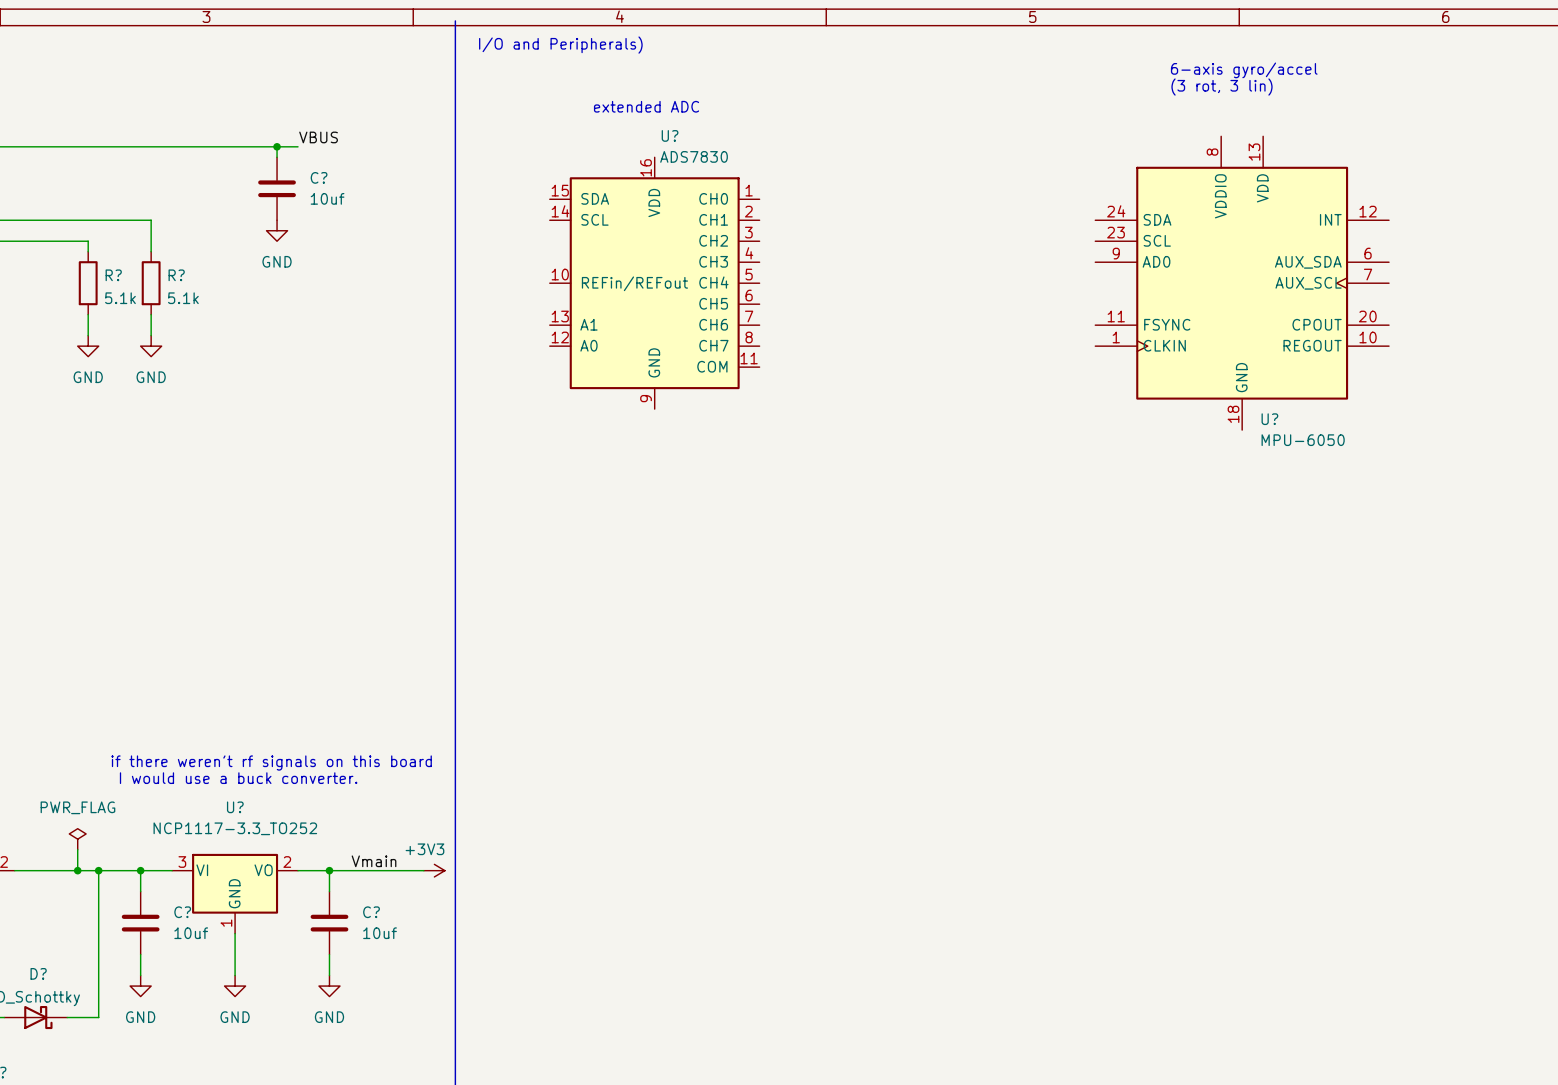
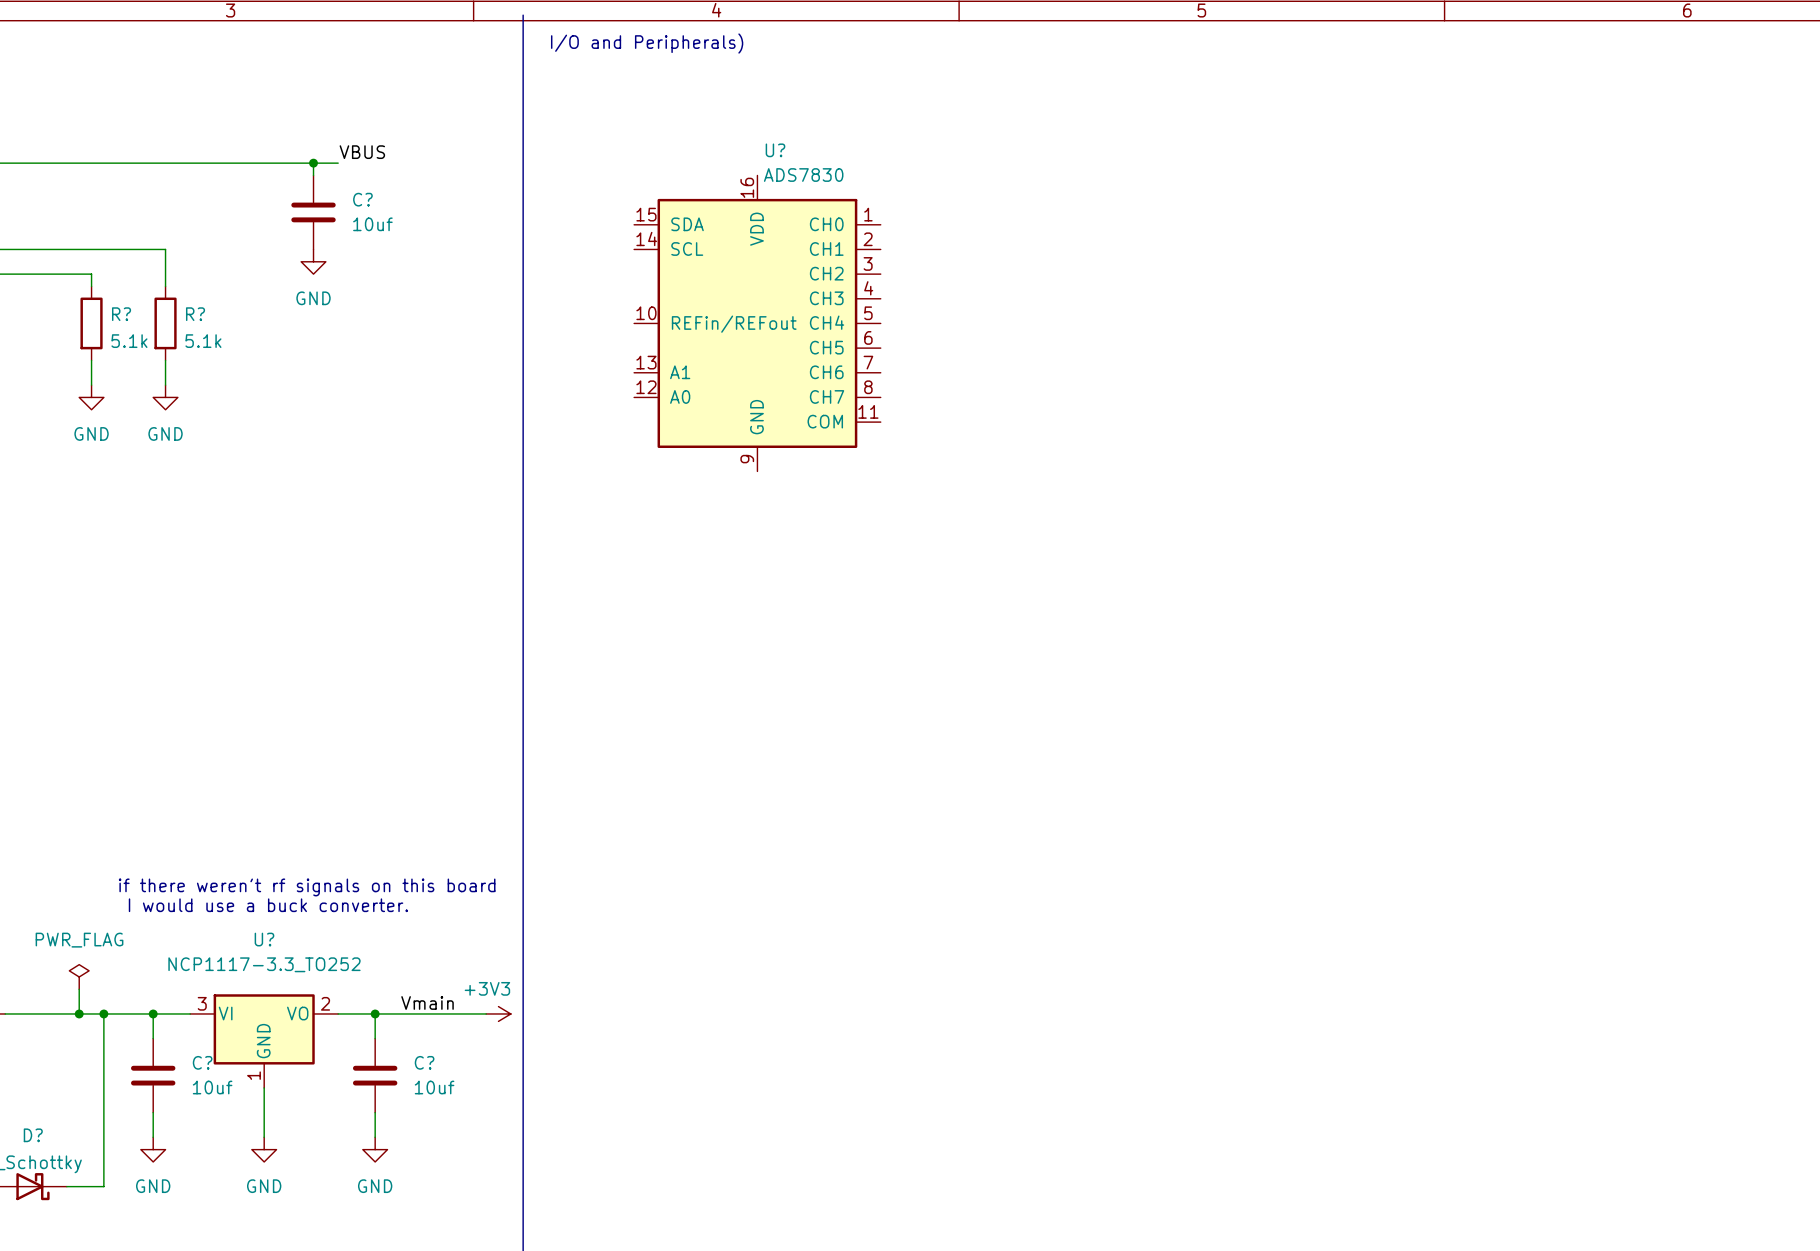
text: 6-axis gyro/accel (1244, 70) -> none
text: (3 rot, 3 lin) (1222, 87) -> none
text: extended ADC (646, 106) -> none
U?: MPU-6050 (1242, 283) -> none

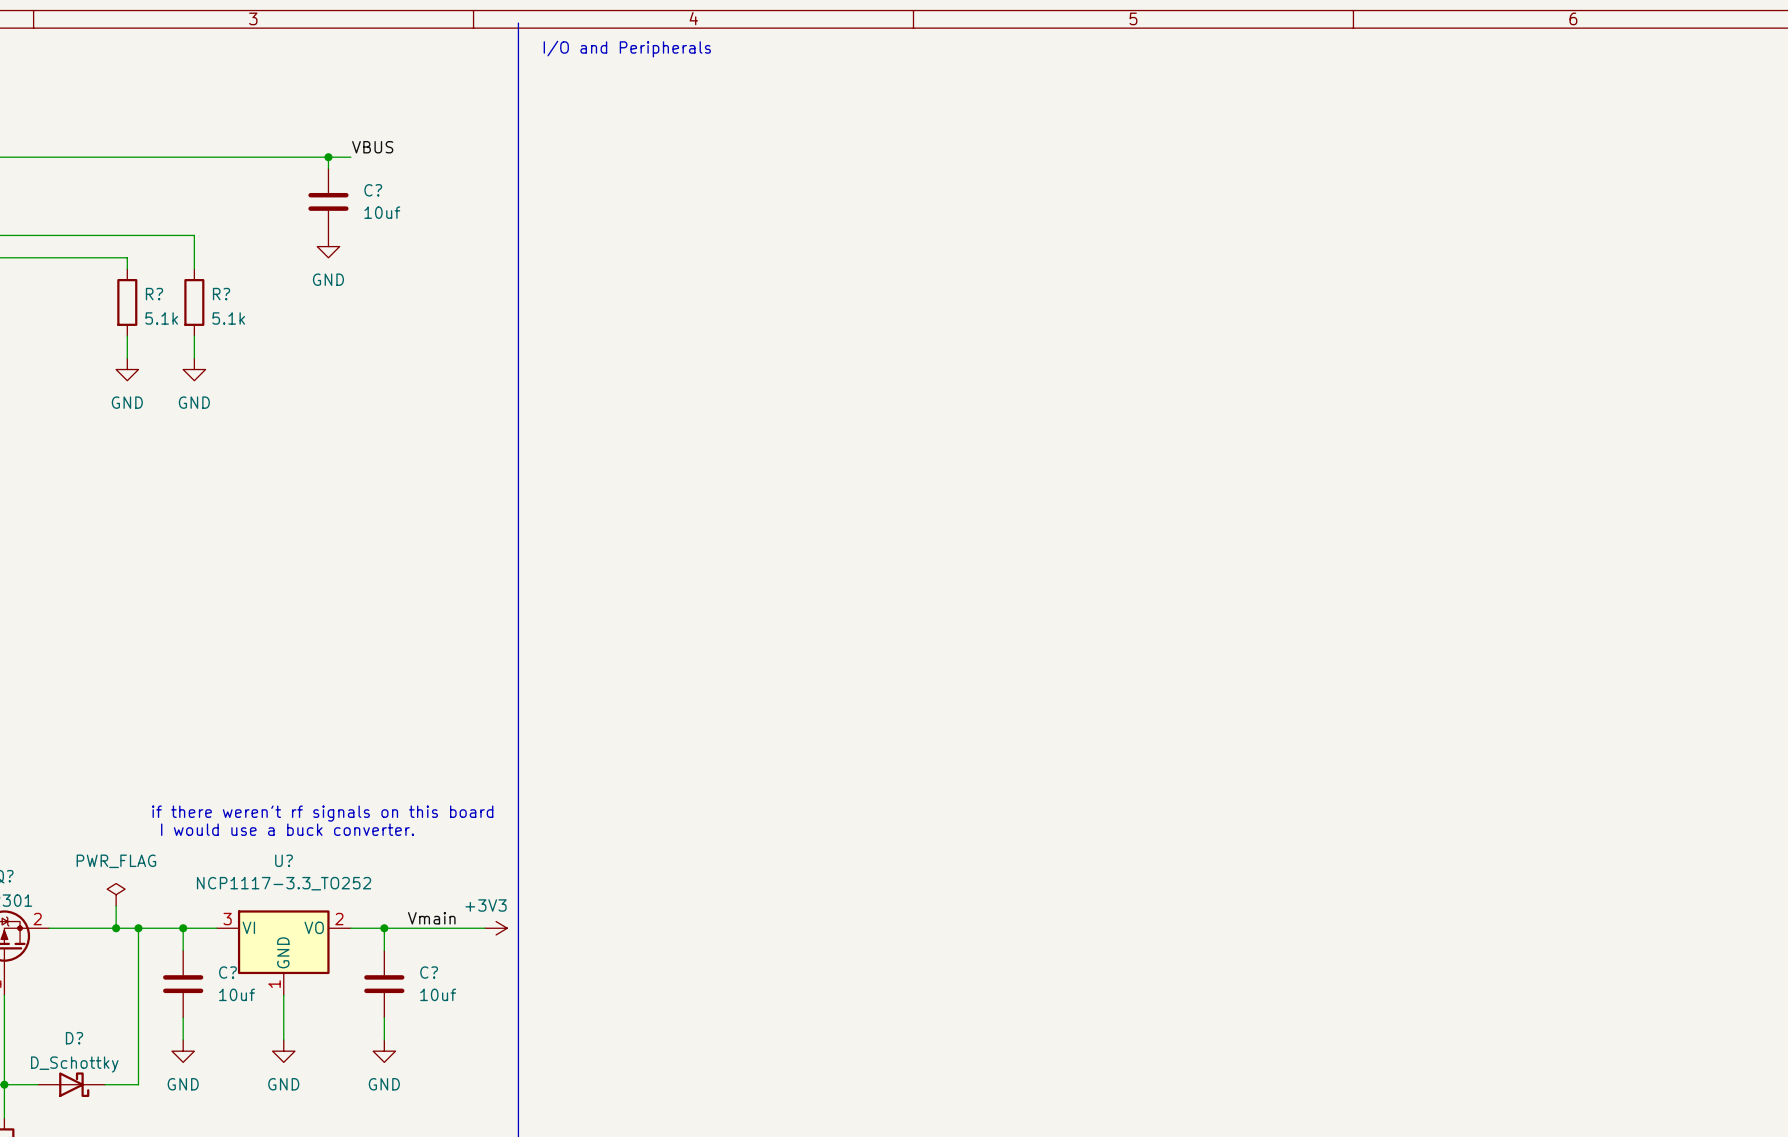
text: I/O and Peripherals) (647, 43) -> I/O and Peripherals (627, 49)
U?: ADS7830 (757, 323) -> none

